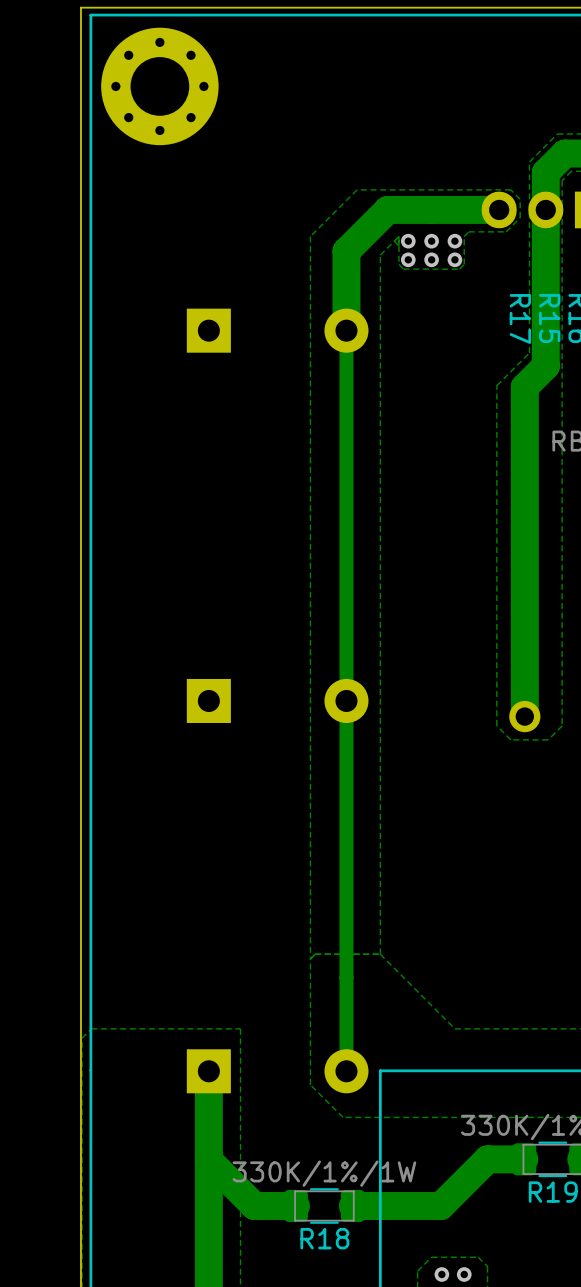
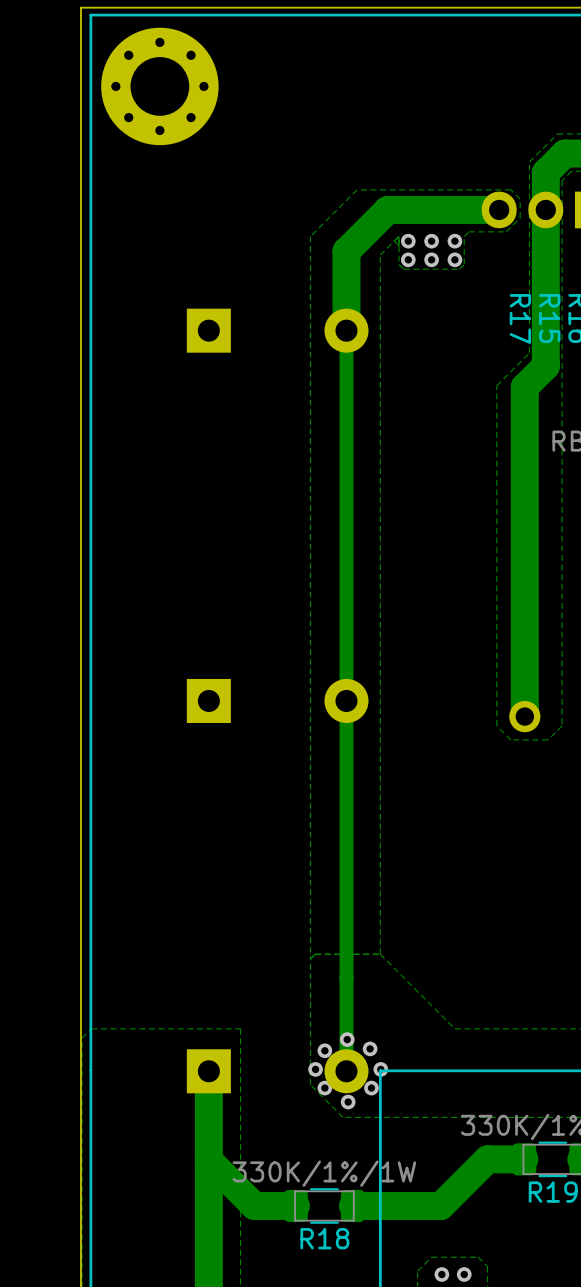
via: none -> (347, 1039)
via: none -> (370, 1048)
via: none -> (324, 1050)
via: none -> (315, 1069)
via: none -> (380, 1069)
via: none -> (324, 1088)
via: none -> (371, 1088)
via: none -> (348, 1102)

